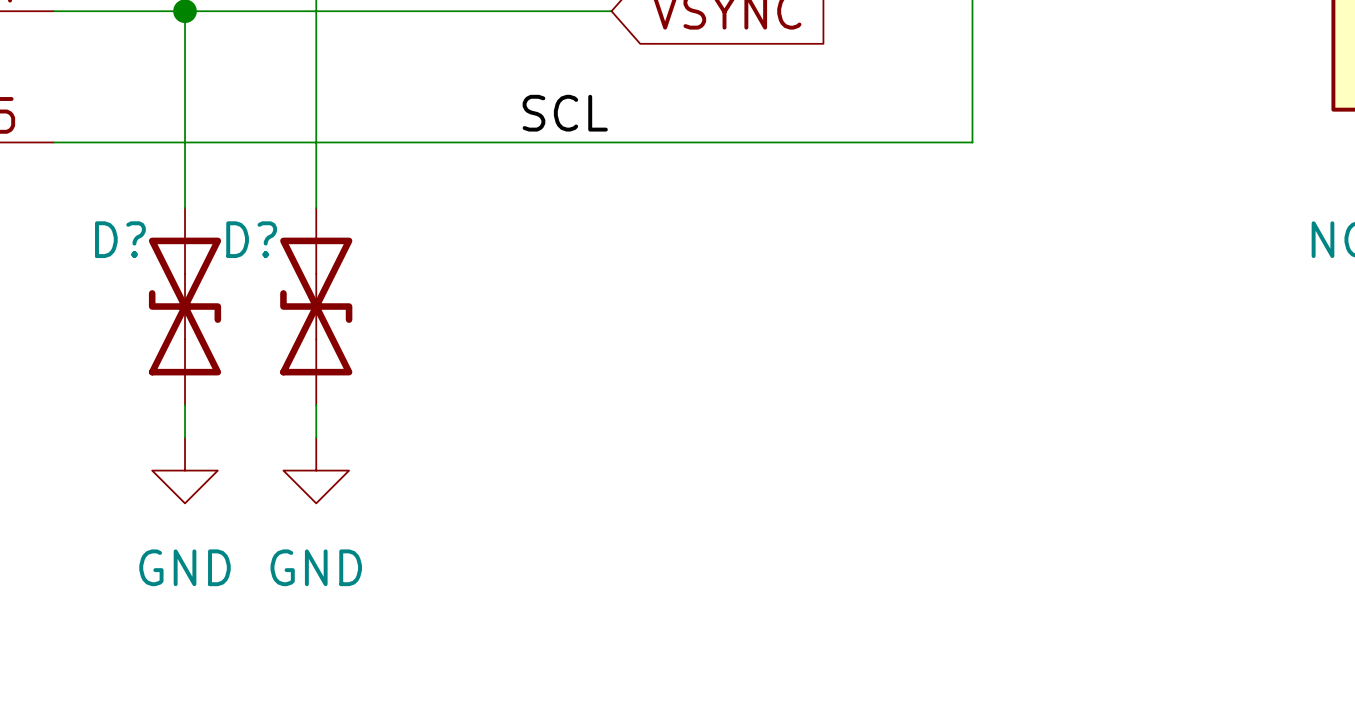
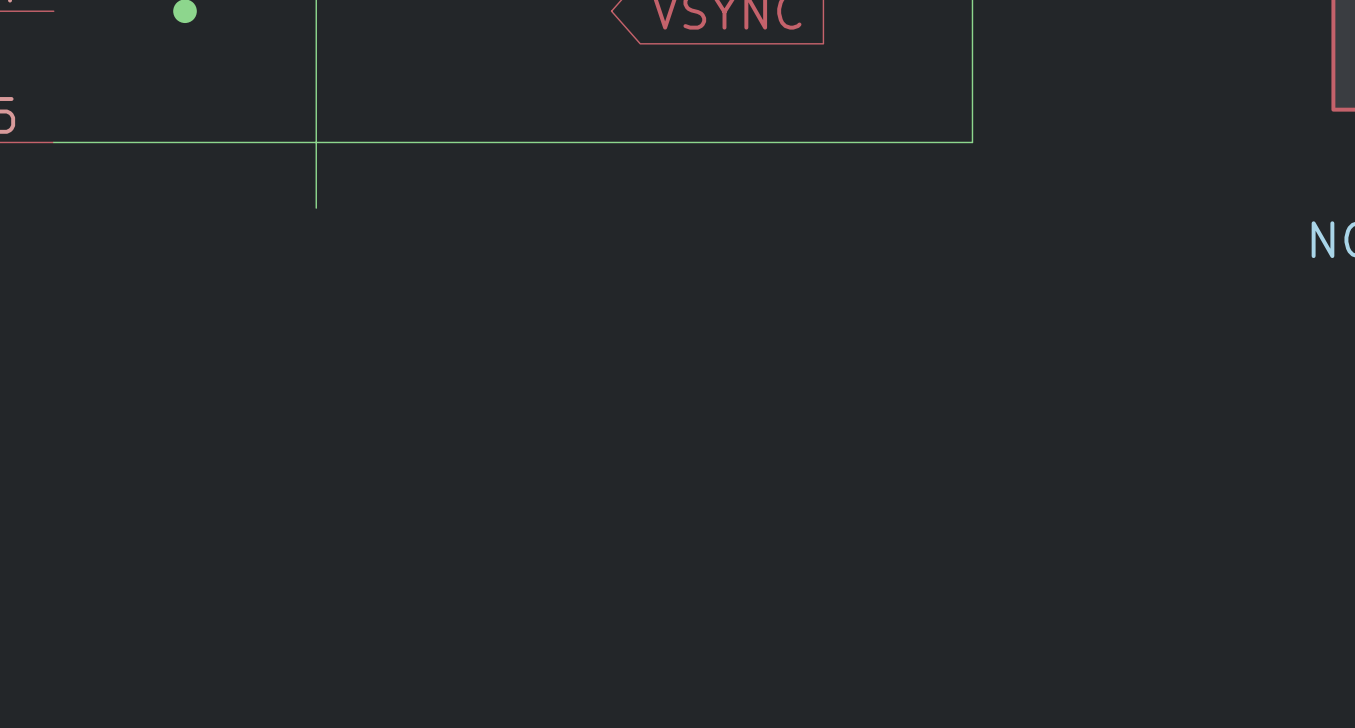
wire: (53, 11) (611, 11) -> none
wire: (185, 11) (185, 208) -> none
label: SCL (565, 113) -> none
D?: (185, 306) -> none
D?: (316, 306) -> none
wire: (185, 404) (185, 437) -> none
wire: (316, 404) (316, 437) -> none
power symbol: GND (185, 470) -> none
power symbol: GND (316, 470) -> none

